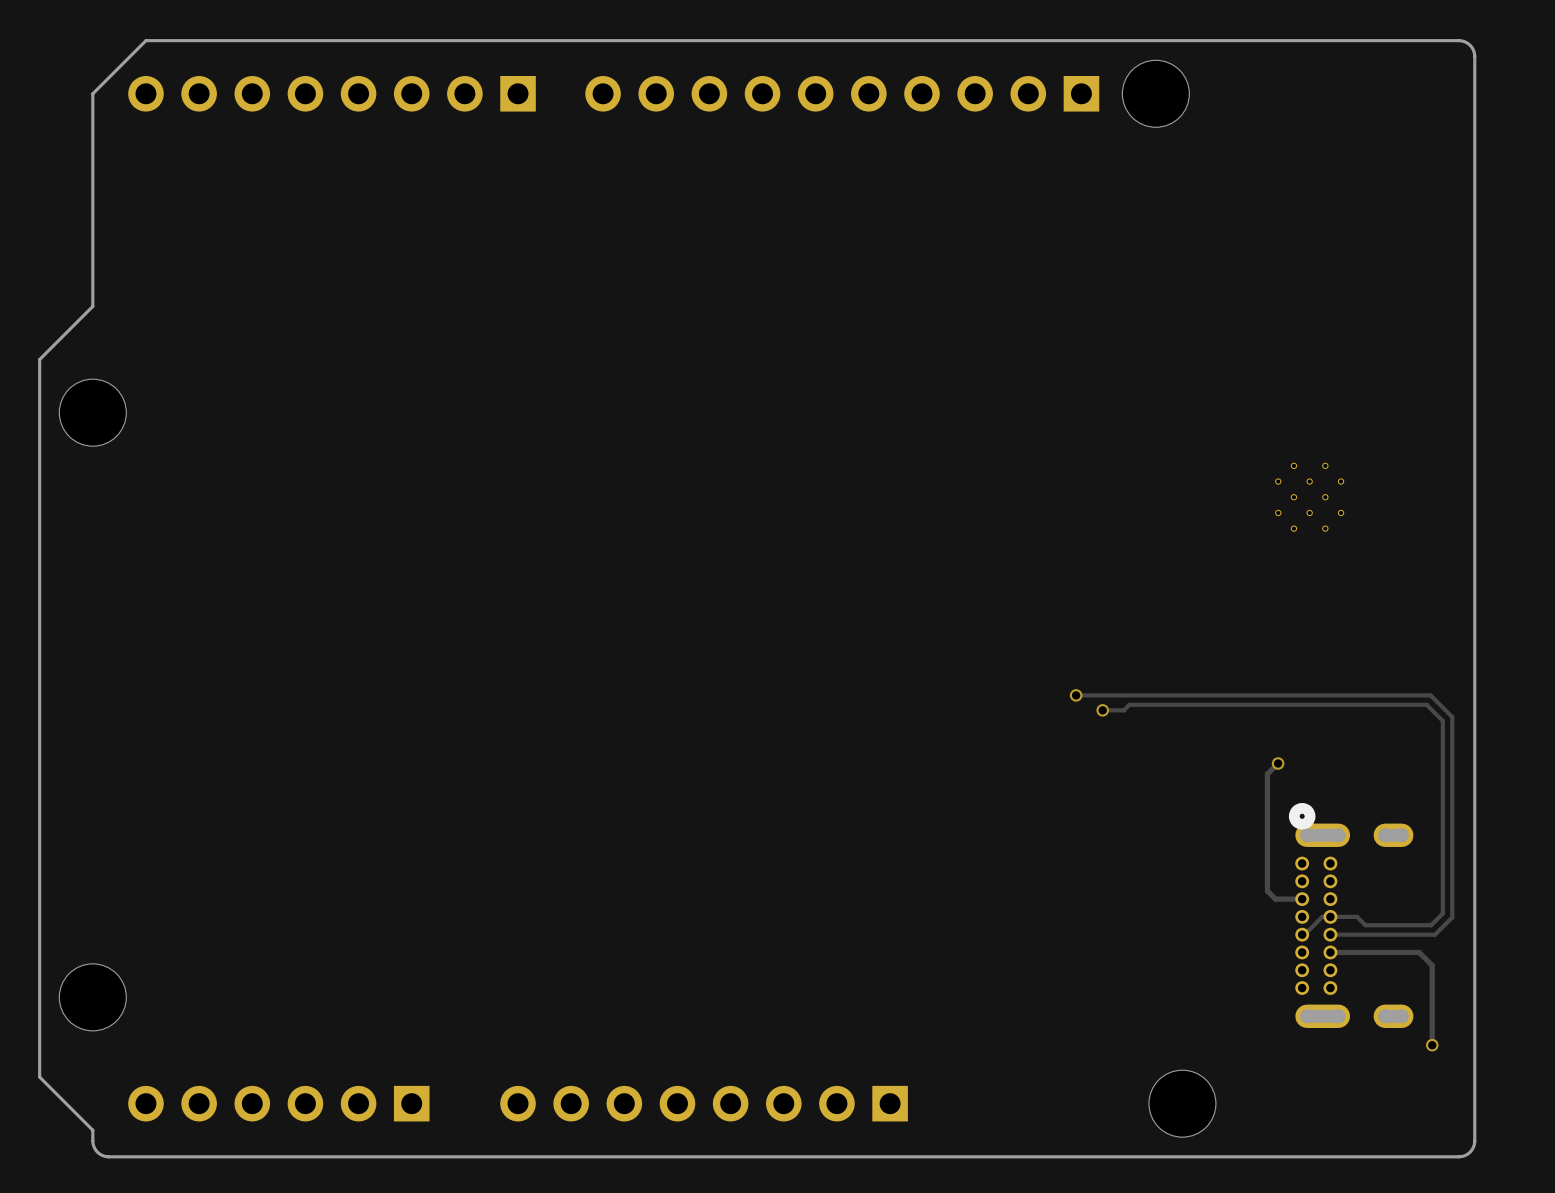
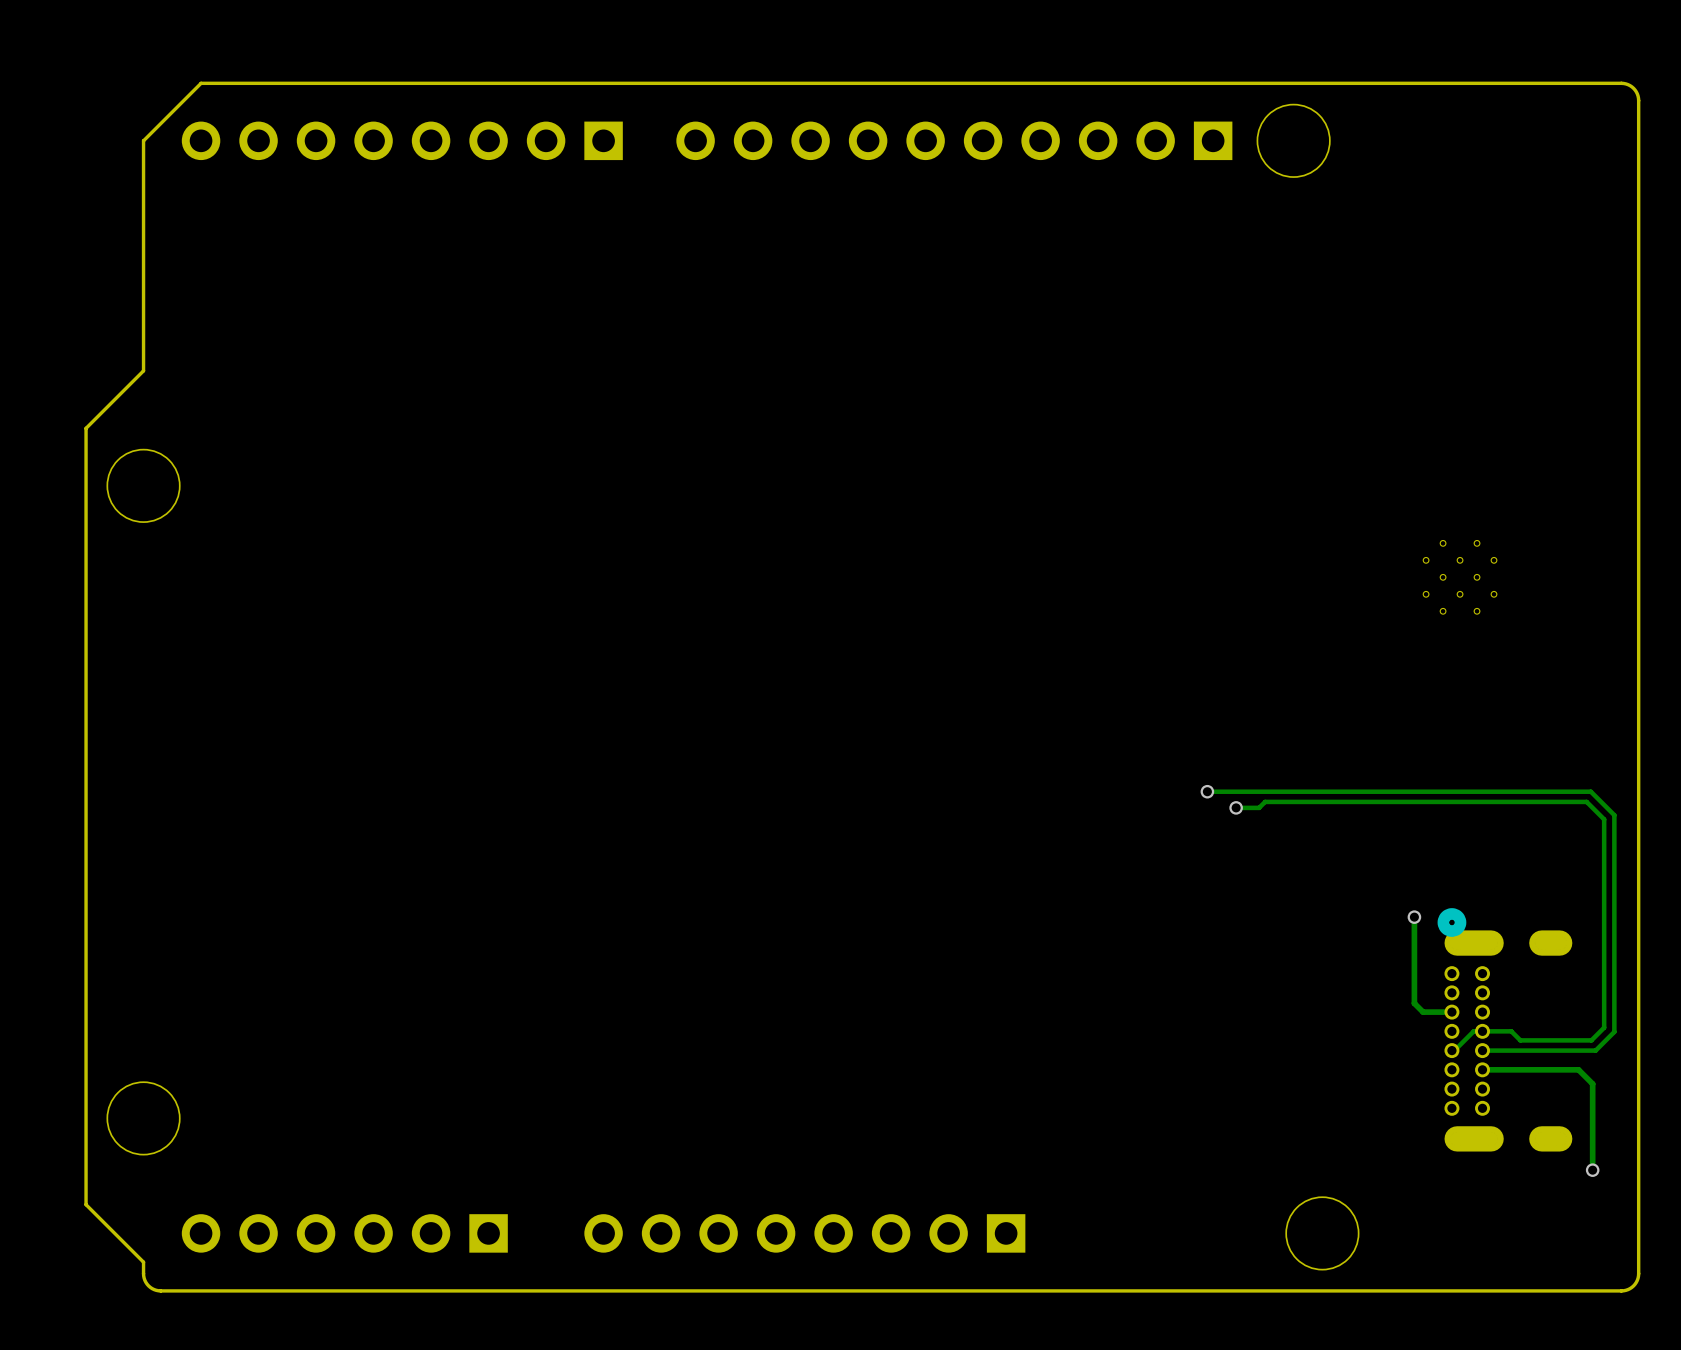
track: (1278, 763) (1267, 774) (1267, 811) -> none
via position: (1278, 763) -> (1414, 917)

